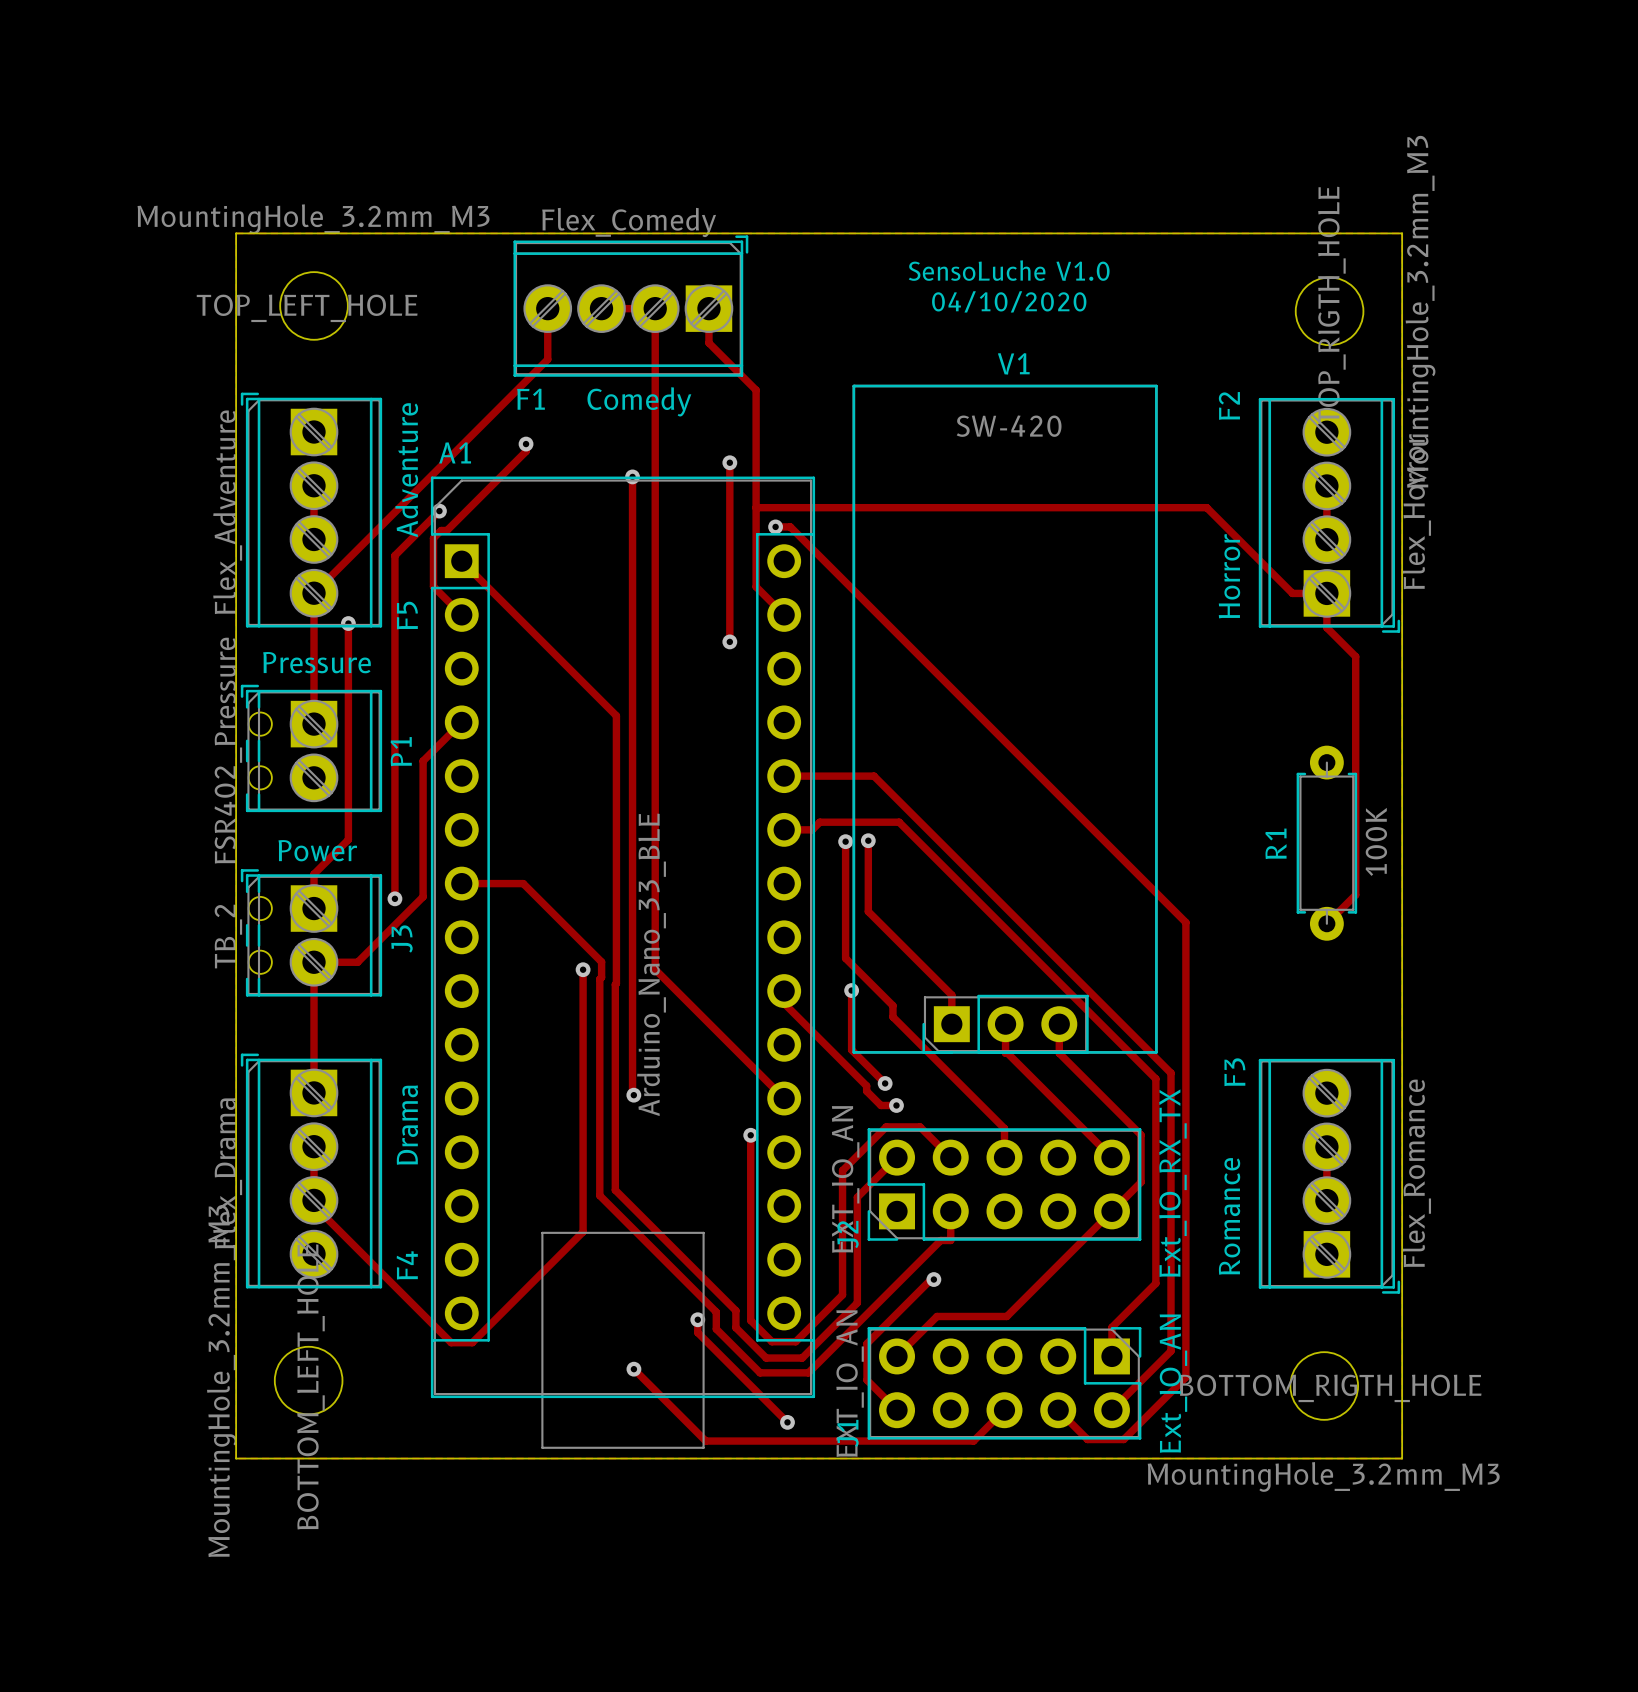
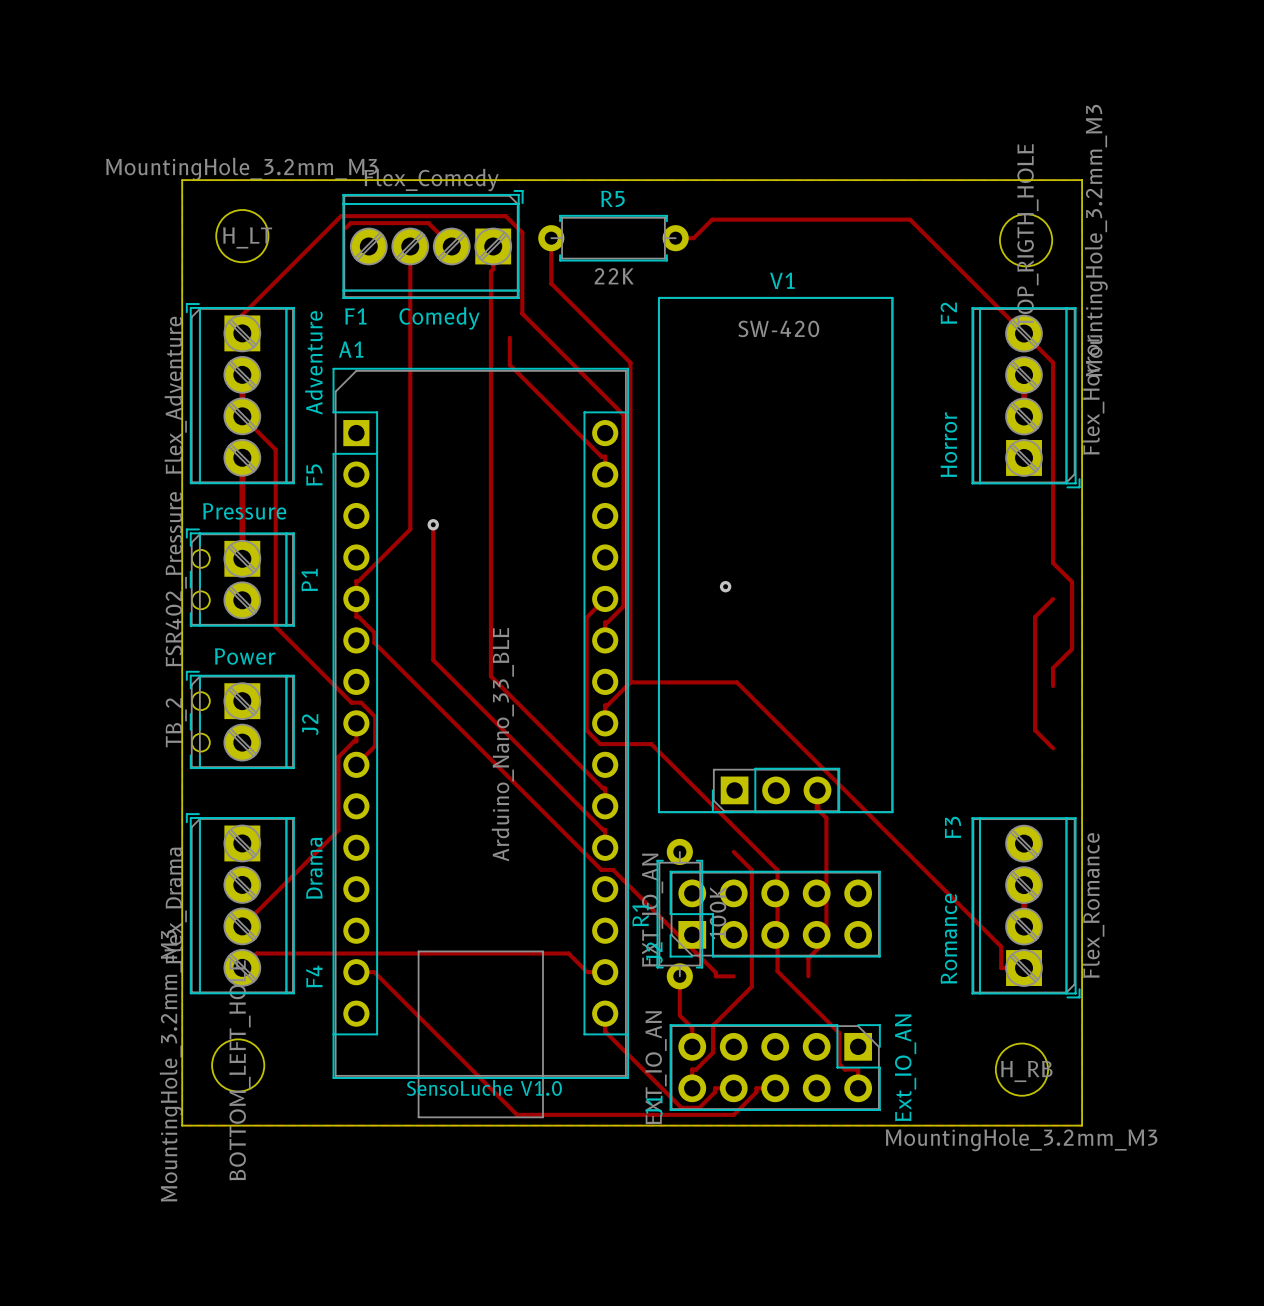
text: SensoLuche V1.0 (1009, 270) -> none
track: none -> (345, 227) (350, 223) (428, 223) (451, 246)
text: 04/10/2020 (1009, 301) -> none
F1 position: (630, 306) -> (432, 244)
TOP_LEFT_HOLE name: TOP_LEFT_HOLE (307, 308) -> H_LT (247, 237)
track: (547, 308) (547, 359) (314, 593) -> none
track: (601, 308) (655, 308) (655, 969) (784, 1098) -> (433, 524) (433, 660) (602, 829) (605, 829) (605, 847)
track: (708, 308) (708, 343) (756, 390) (756, 586) (784, 614) -> (509, 337) (509, 364) (601, 456) (605, 456) (605, 474)
track: none -> (551, 238) (551, 283) (630, 362) (630, 682)
R5: none -> 22K (613, 238)
track: none -> (675, 238) (693, 238) (712, 219) (910, 219) (1053, 362) (1053, 563) (1072, 582) (1072, 649) (1053, 668) (1053, 686)
track: none -> (410, 246) (410, 529) (358, 581) (356, 581) (356, 616) (374, 632) (374, 642) (601, 869) (613, 869) (715, 972) (715, 976) (733, 976)
track: none -> (493, 246) (493, 269) (490, 271) (490, 676) (602, 788) (605, 788) (605, 806)
text position: Comedy (639, 401) -> Comedy (439, 318)
track: (526, 444) (526, 451) (447, 530) (441, 530) (433, 538) (433, 586) (461, 614) -> none
via: (526, 444) -> none
track: (729, 462) (729, 641) -> none
via: (729, 462) -> none
track: (632, 476) (633, 1095) -> none
via: (632, 476) -> none
track: (756, 507) (1206, 507) (1292, 593) (1326, 593) (1326, 627) (1355, 656) (1355, 894) (1326, 923) -> none
track: (439, 511) (394, 555) (394, 898) -> none
via: (439, 511) -> none
track: (775, 526) (790, 526) (1185, 922) (1185, 1377) (1123, 1439) (1087, 1439) (1058, 1410) -> none
via: (775, 526) -> none
track: none -> (242, 416) (275, 449) (275, 626) (351, 702) (361, 702) (375, 716) (375, 746) (356, 764)
track: (461, 561) (616, 715) (615, 1190) (735, 1310) (735, 1327) (766, 1358) (802, 1358) (857, 1302) (857, 1197) (897, 1157) -> none
track: (348, 623) (348, 839) (314, 874) (314, 908) -> none
via: (348, 623) -> none
via: (729, 641) -> none
via: none -> (433, 524)
track: (461, 722) (423, 761) (423, 896) (357, 962) (314, 962) (314, 1092) -> none
via: none -> (725, 586)
track: (784, 776) (874, 776) (1171, 1073) (1171, 1351) (1111, 1410) -> (605, 598) (586, 617) (586, 730) (600, 744) (651, 744) (777, 870) (777, 971) (839, 1033) (839, 1064) (844, 1069) (858, 1069) (858, 1088)
track: none -> (1053, 598) (1035, 616) (1035, 730) (1053, 748)
track: (784, 829) (812, 829) (819, 822) (899, 822) (1155, 1078) (1155, 1283) (1111, 1327) (1111, 1356) -> (605, 640) (605, 622) (623, 606) (623, 414) (522, 313) (522, 232) (505, 216) (341, 216) (242, 314) (242, 333)
track: (868, 840) (868, 911) (951, 995) (951, 1024) -> none
via: (868, 840) -> none
track: (845, 841) (845, 958) (892, 1005) (892, 1016) (1004, 1128) (1004, 1157) -> none
via: (845, 841) -> none
R1 position: (1326, 843) -> (679, 914)
track: (461, 883) (523, 883) (601, 961) (601, 977) (599, 979) (599, 1195) (716, 1312) (716, 1329) (760, 1372) (808, 1372) (940, 1240) (950, 1240) (950, 1211) -> none
track: none -> (630, 682) (607, 705) (605, 705) (605, 723)
track: none -> (630, 682) (736, 682) (1001, 946) (1001, 968) (1024, 968)
via: (394, 898) -> none
track: none -> (356, 723) (356, 741) (338, 757) (338, 830) (242, 926)
J3 name: J3 (402, 939) -> J2 (310, 724)
track: (583, 969) (583, 1231) (472, 1342) (451, 1342) (314, 1205) (314, 1146) -> none
via: (583, 969) -> none
track: (851, 990) (851, 1049) (885, 1083) -> none
via: (851, 990) -> none
track: (784, 991) (784, 1003) (866, 1085) (866, 1091) (880, 1105) (896, 1105) -> none
track: (1005, 1024) (1005, 1053) (1111, 1157) -> none
track: (1059, 1048) (1059, 1053) (1141, 1135) (1141, 1182) (1006, 1316) (936, 1316) (897, 1356) -> (817, 809) (826, 818) (826, 940) (808, 958) (808, 976)
via: (885, 1083) -> none
via: (633, 1095) -> none
via: (896, 1105) -> none
track: (750, 1135) (750, 1320) (771, 1341) (795, 1341) (842, 1294) (842, 1170) (886, 1126) (920, 1126) (950, 1157) -> none
via: (750, 1135) -> none
text: Ext_IO_RX_TX (1172, 1183) -> none
track: none -> (242, 967) (256, 953) (568, 953) (587, 972) (605, 972)
track: none -> (679, 976) (679, 1015) (692, 1028) (692, 1046)
track: (933, 1279) (931, 1279) (866, 1343) (866, 1380) (897, 1410) -> (733, 851) (751, 870) (751, 986) (713, 1025) (713, 1052) (696, 1069) (692, 1069) (692, 1088)
via: (933, 1279) -> none
track: none -> (605, 1013) (605, 1031) (681, 1107) (699, 1107) (714, 1092) (714, 1088) (733, 1088)
track: (697, 1319) (697, 1332) (787, 1422) -> none
via: (697, 1319) -> none
track: (633, 1369) (705, 1441) (973, 1441) (1004, 1410) -> (356, 972) (374, 972) (517, 1114) (733, 1114) (756, 1092) (756, 1088) (775, 1088)
via: (633, 1369) -> none
BOTTOM_RIGTH_HOLE name: BOTTOM_RIGTH_HOLE (1330, 1388) -> H_RB (1026, 1071)
text: none -> SensoLuche V1.0 (484, 1087)
via: (787, 1422) -> none

